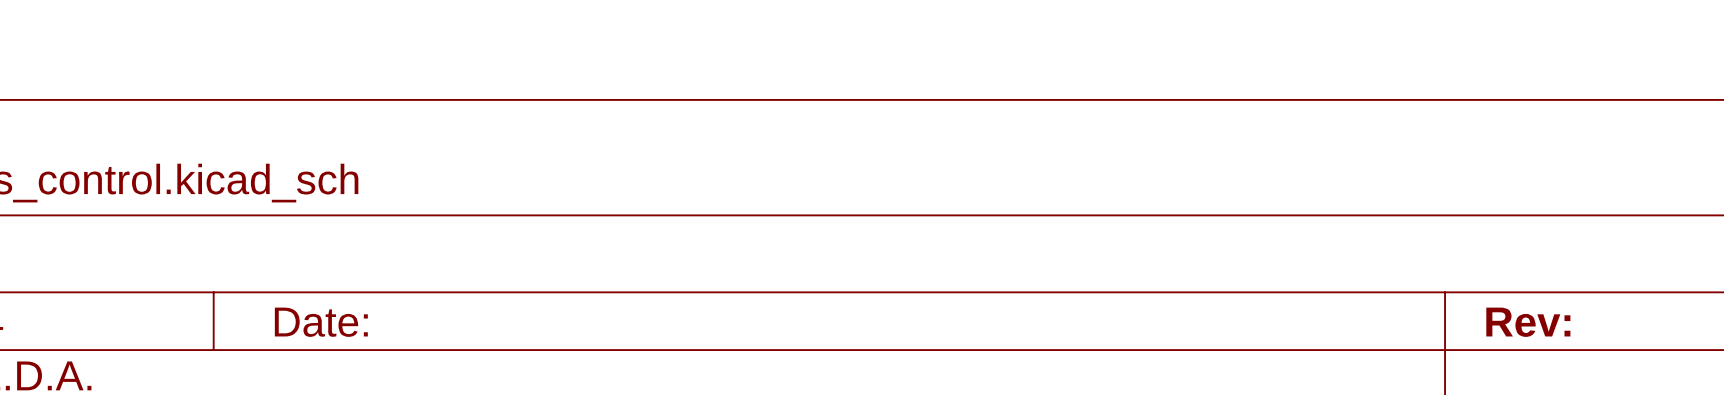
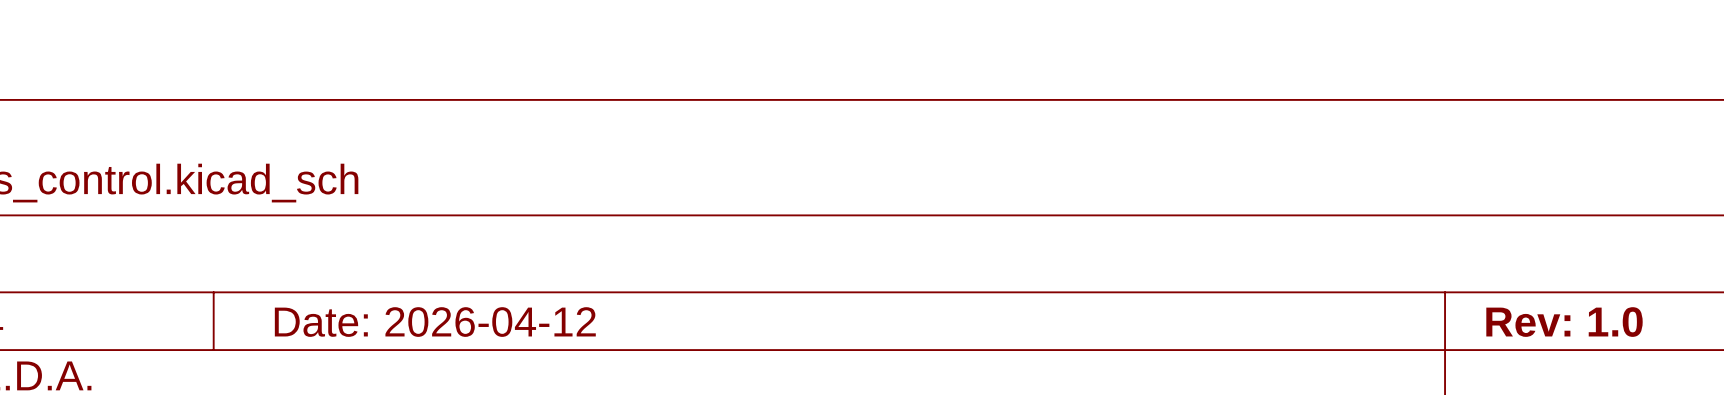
title block: Date: (321, 322) -> Date: 2026-04-12 (435, 322)
title block: Rev: (1528, 322) -> Rev: 1.0 (1564, 322)

